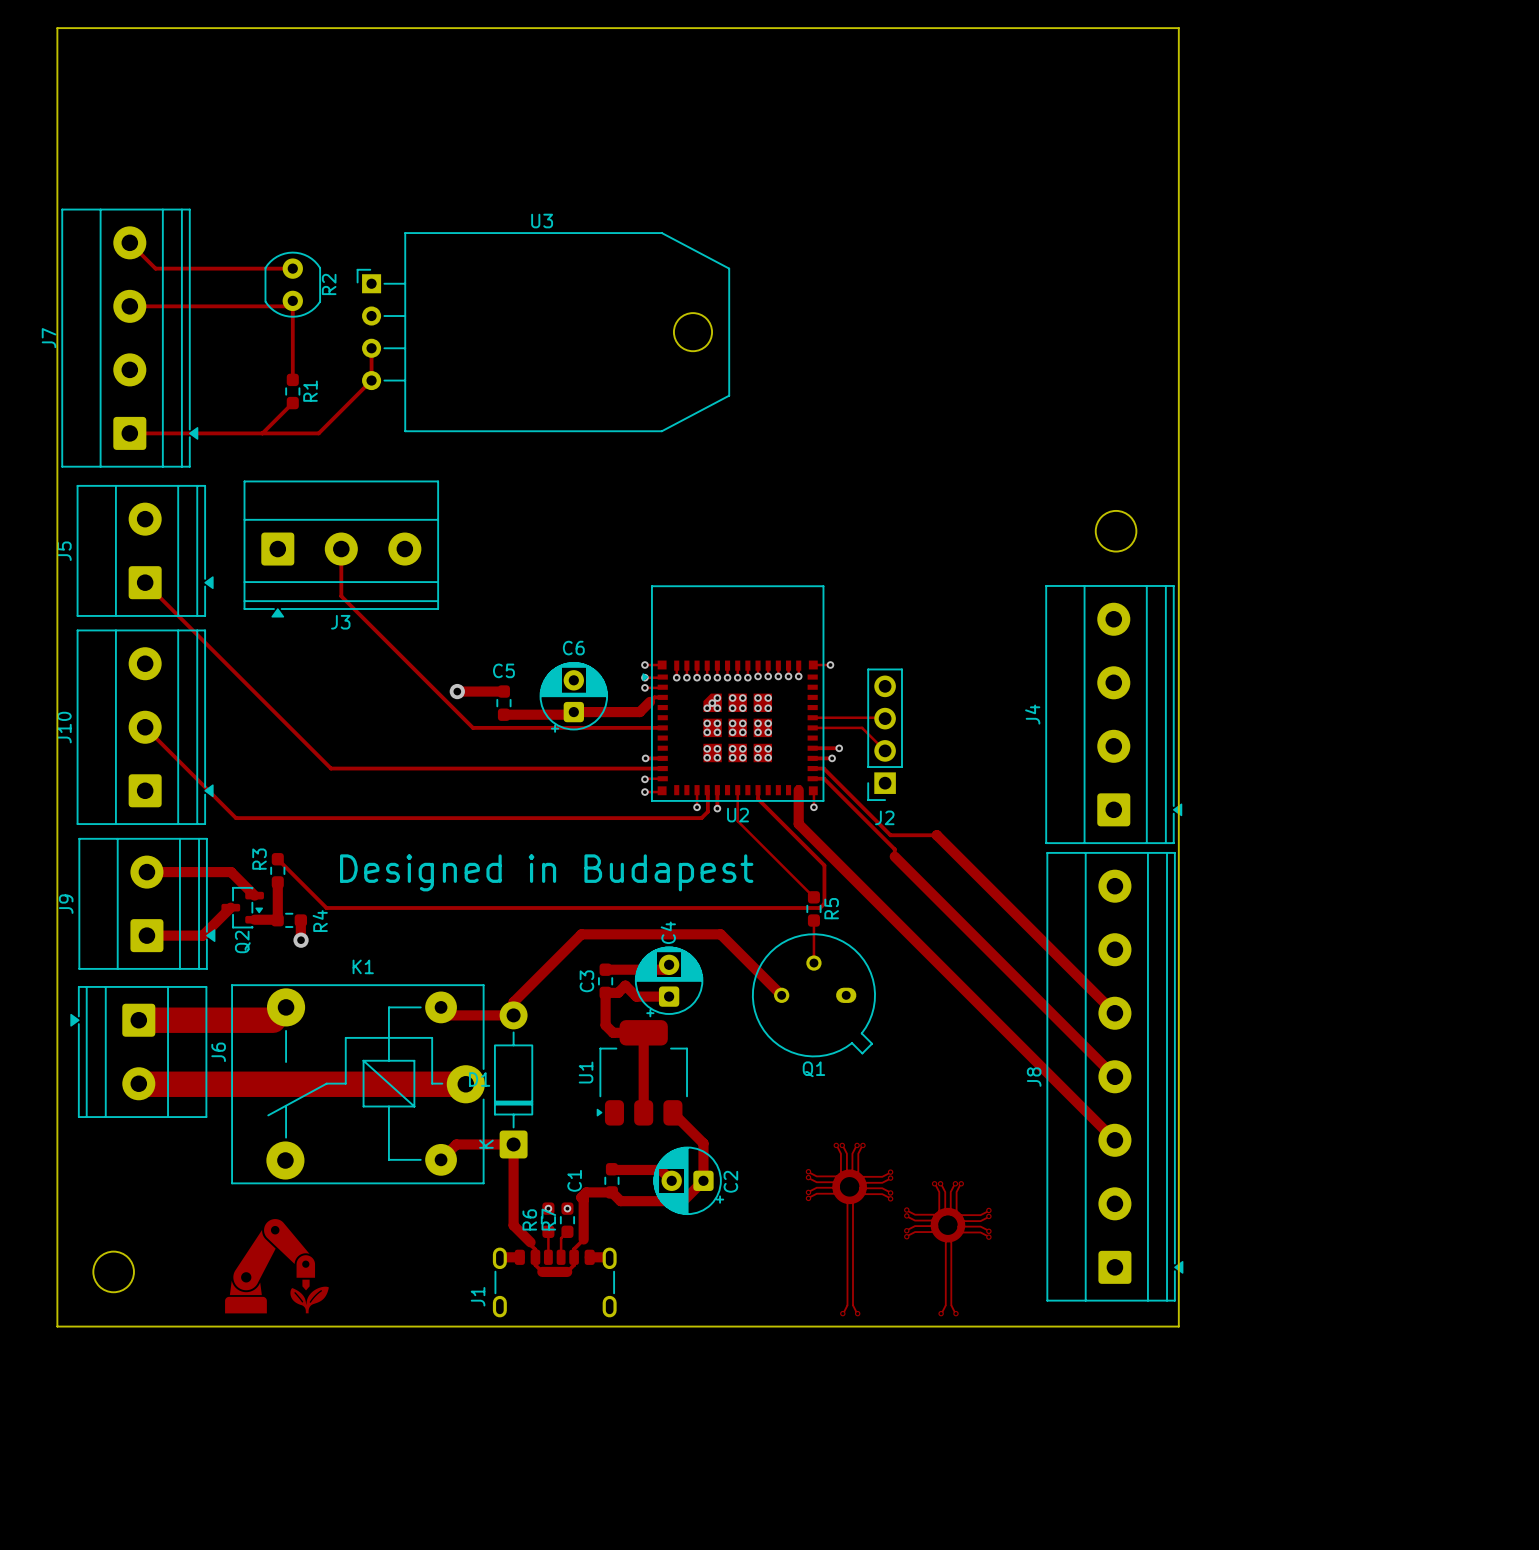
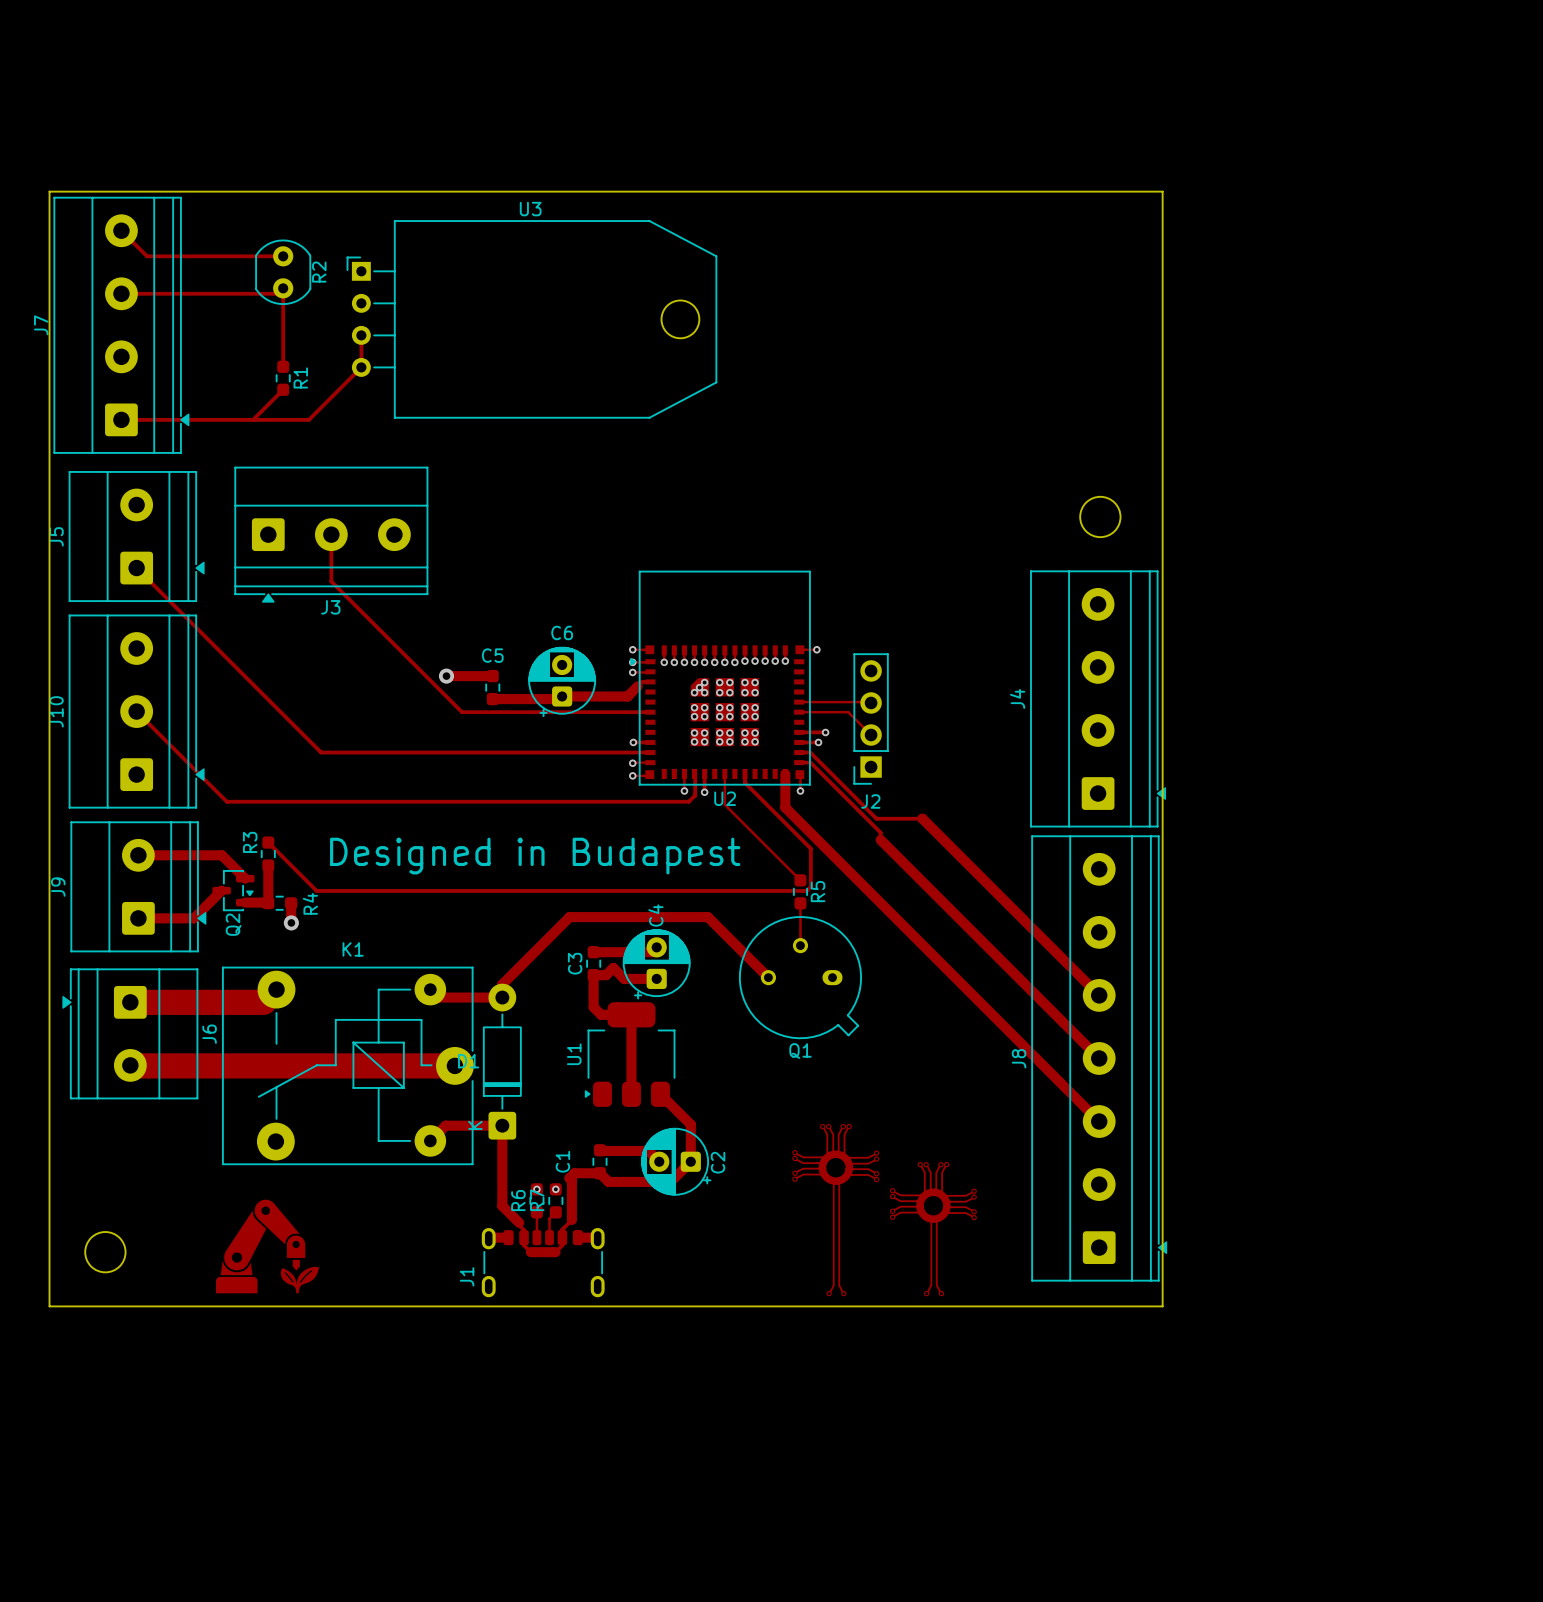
board edge: (57, 203) (57, 28) (1178, 28) (1178, 203) -> (49, 191) (1162, 191)

